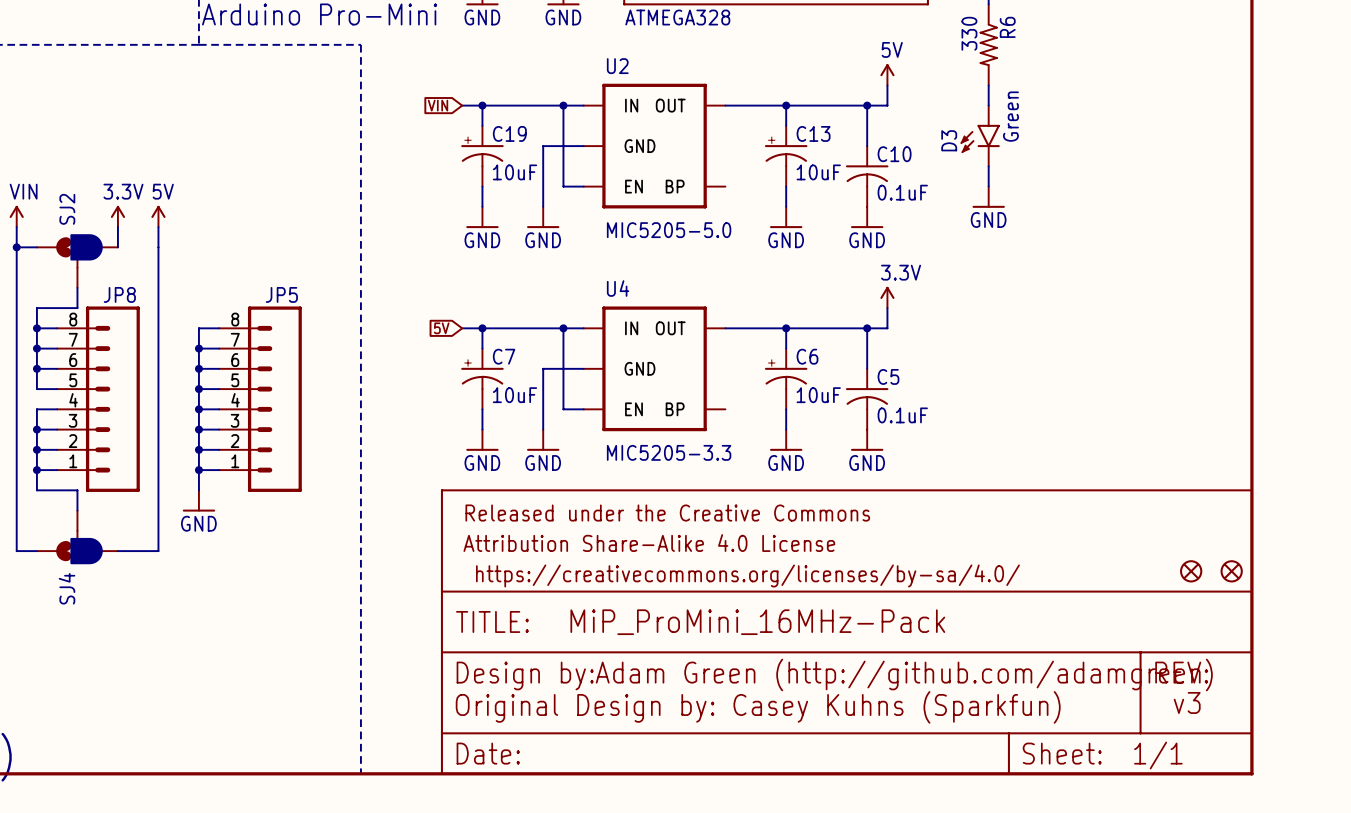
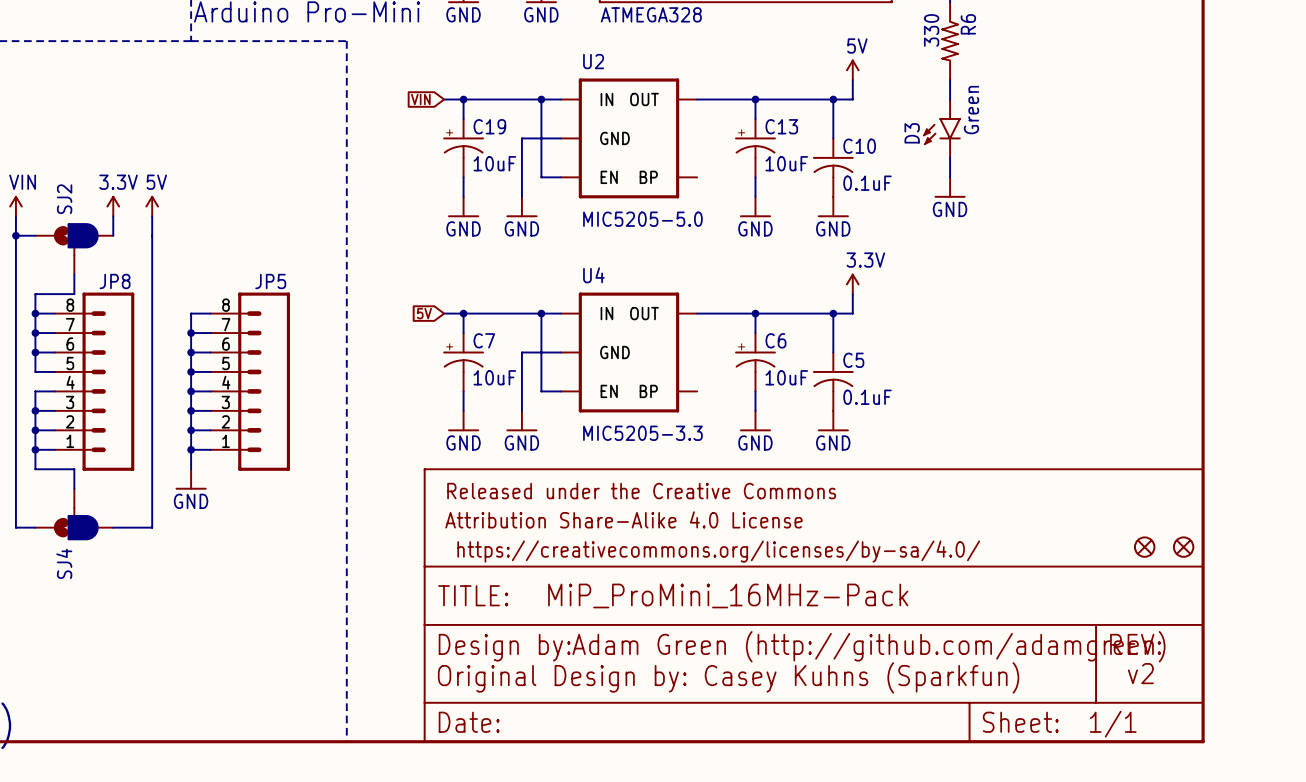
text: v3 (1187, 702) -> v2 (1140, 673)

